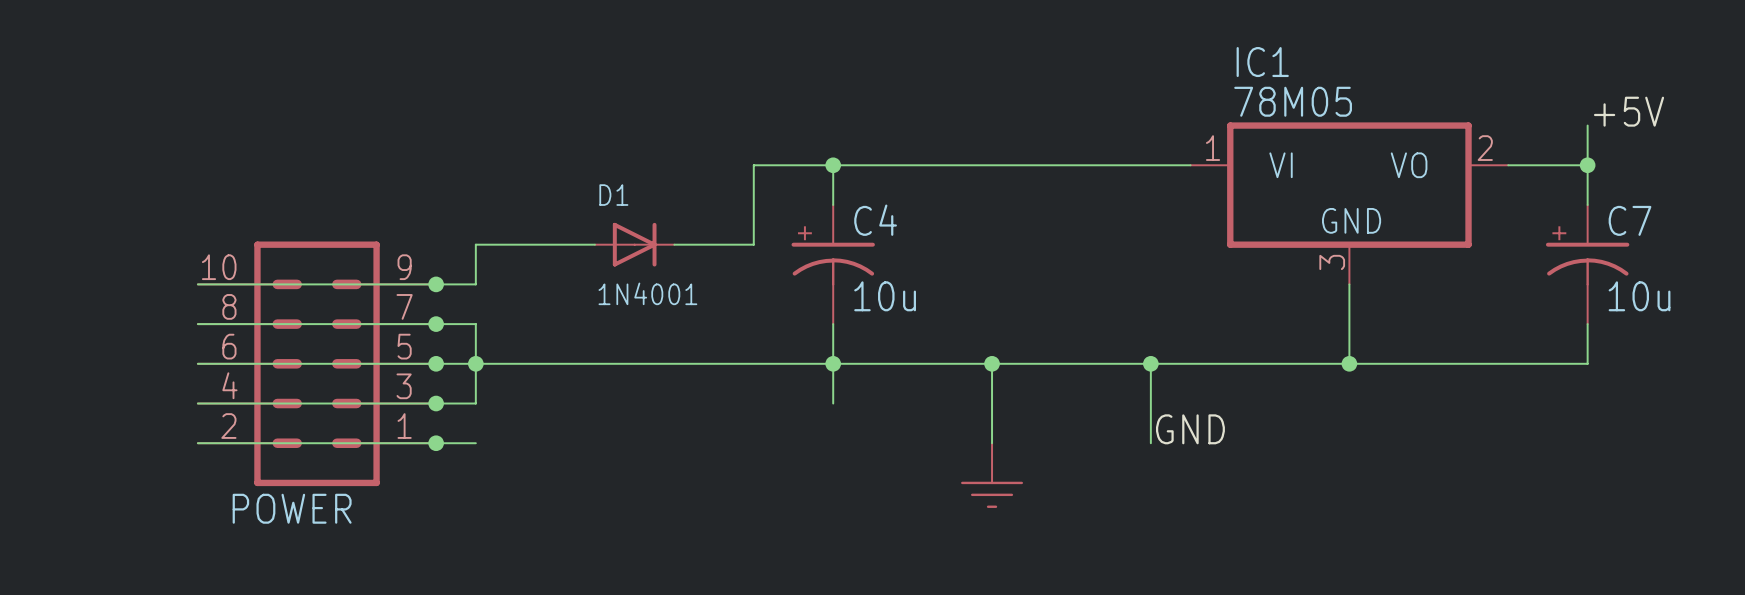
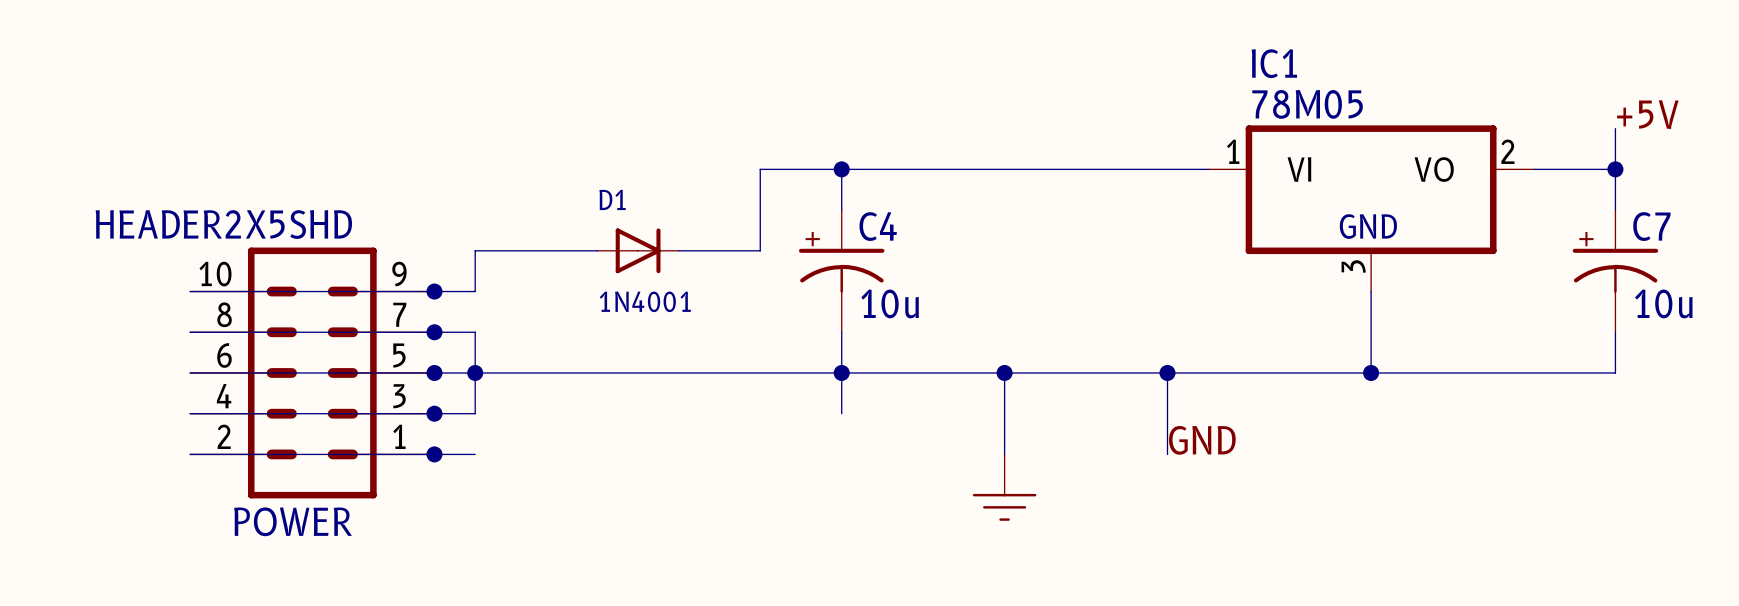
POWER value: none -> HEADER2X5SHD (223, 224)

